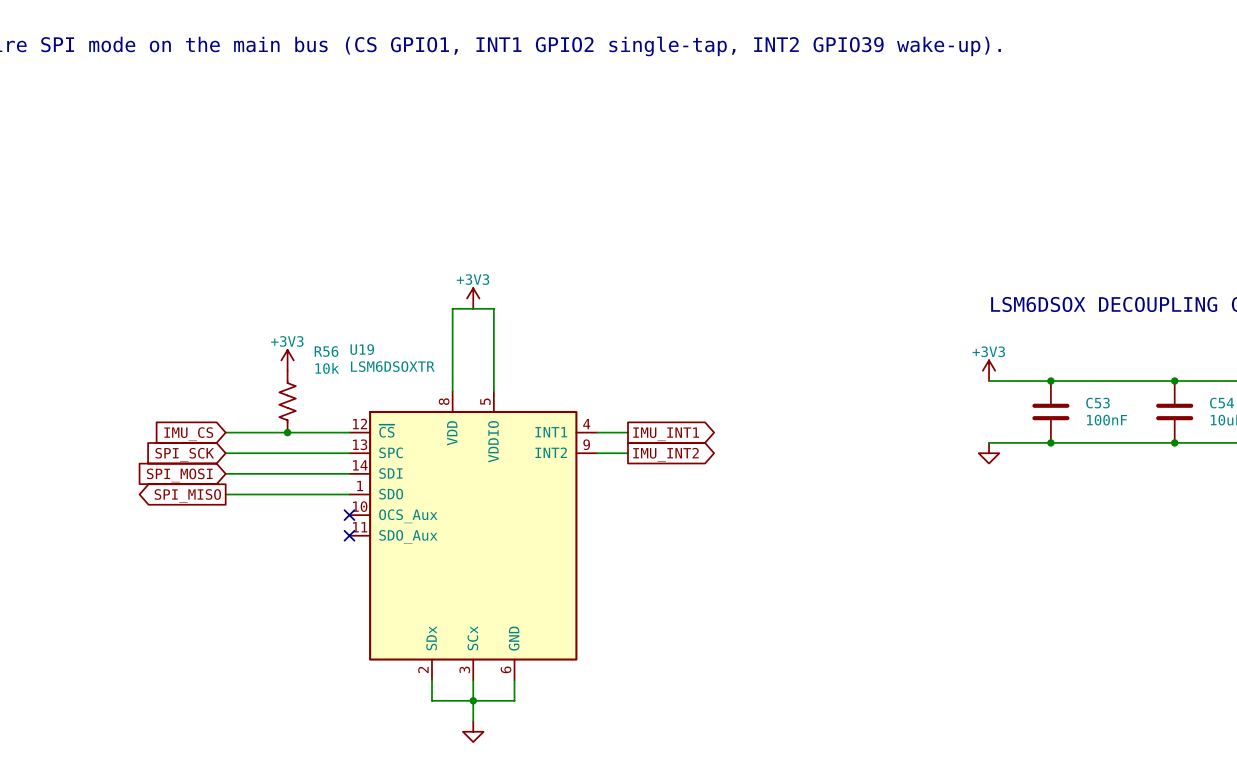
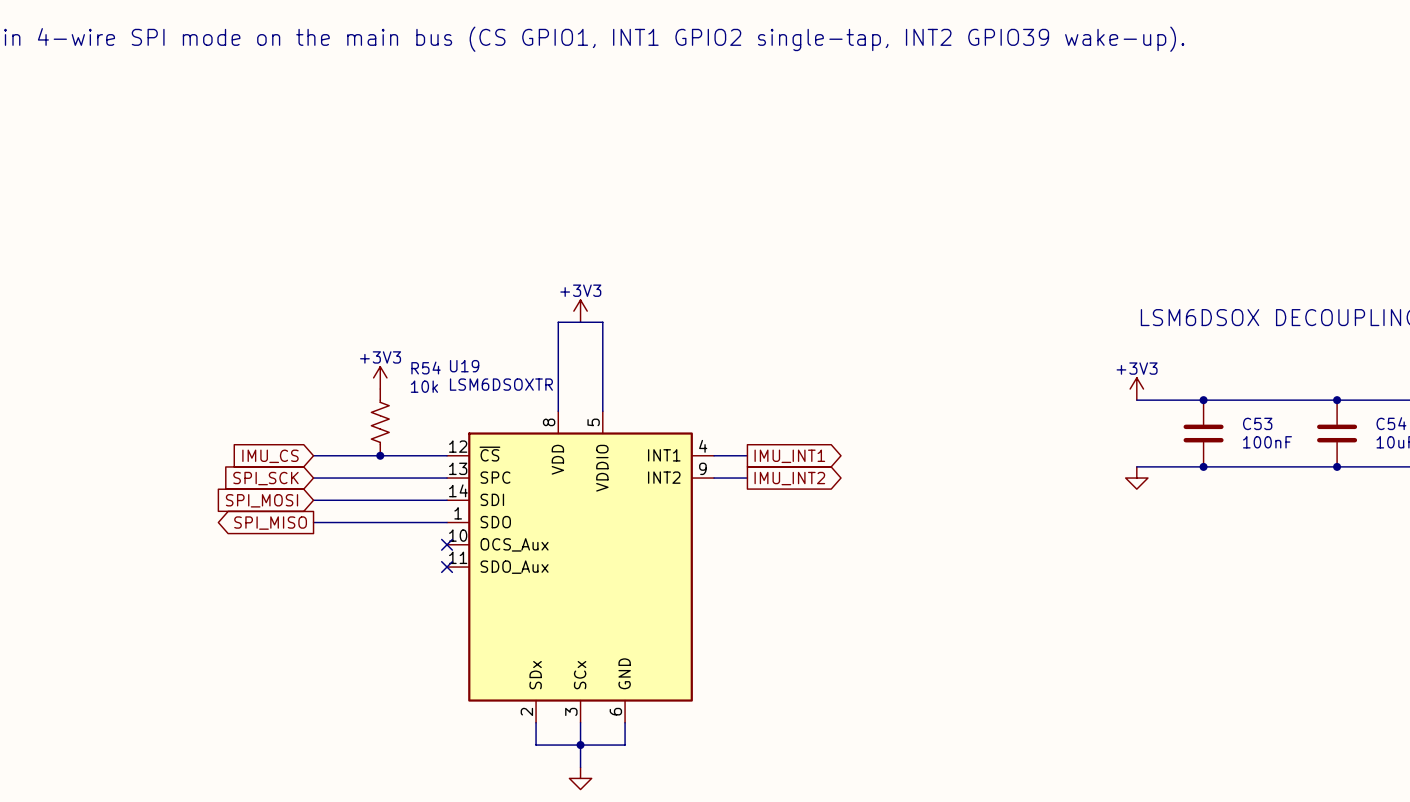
R56 name: R56 (326, 351) -> R54 (426, 368)

